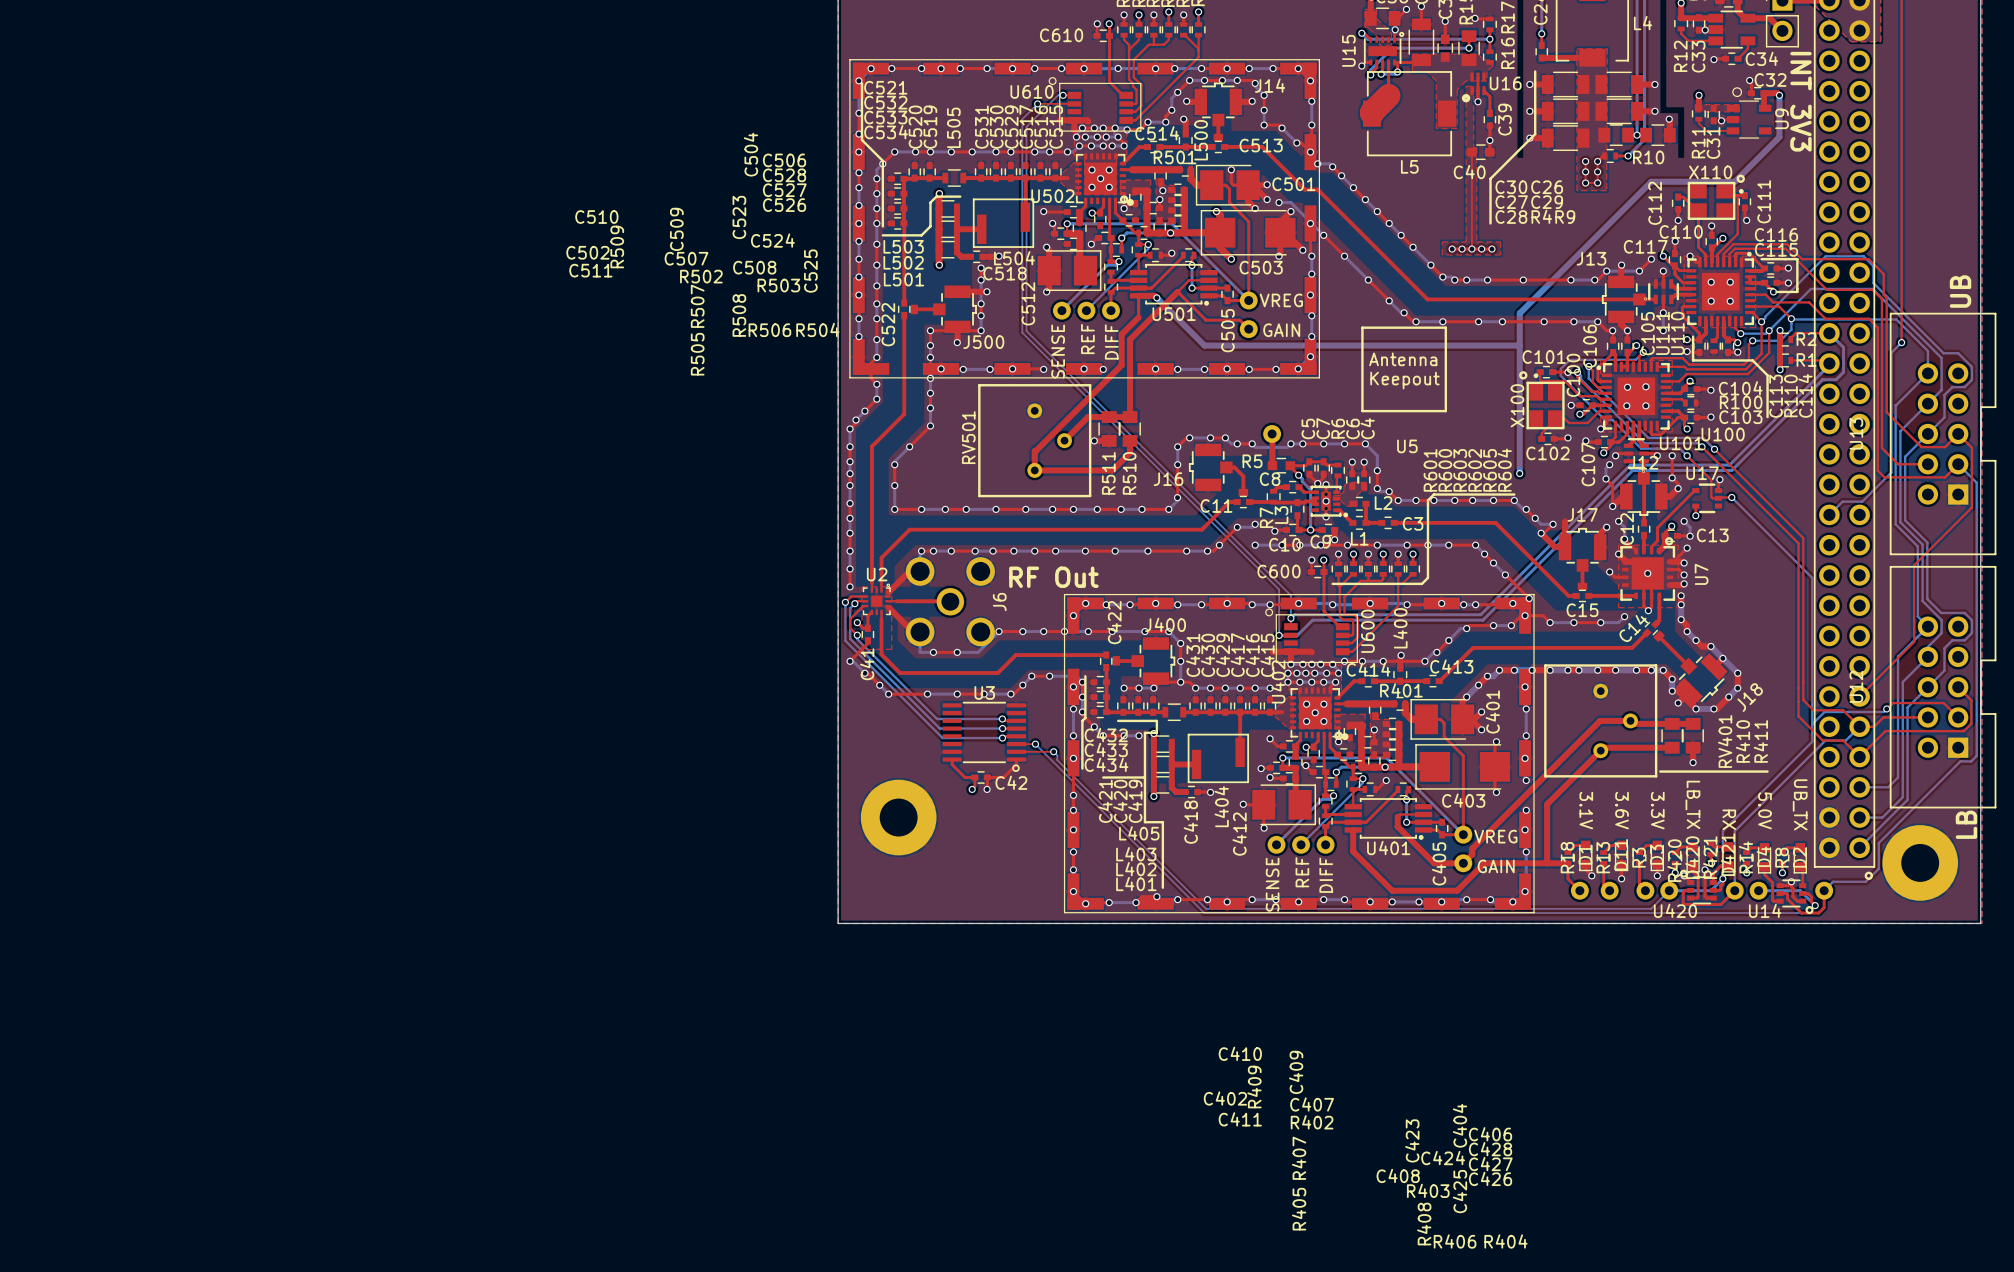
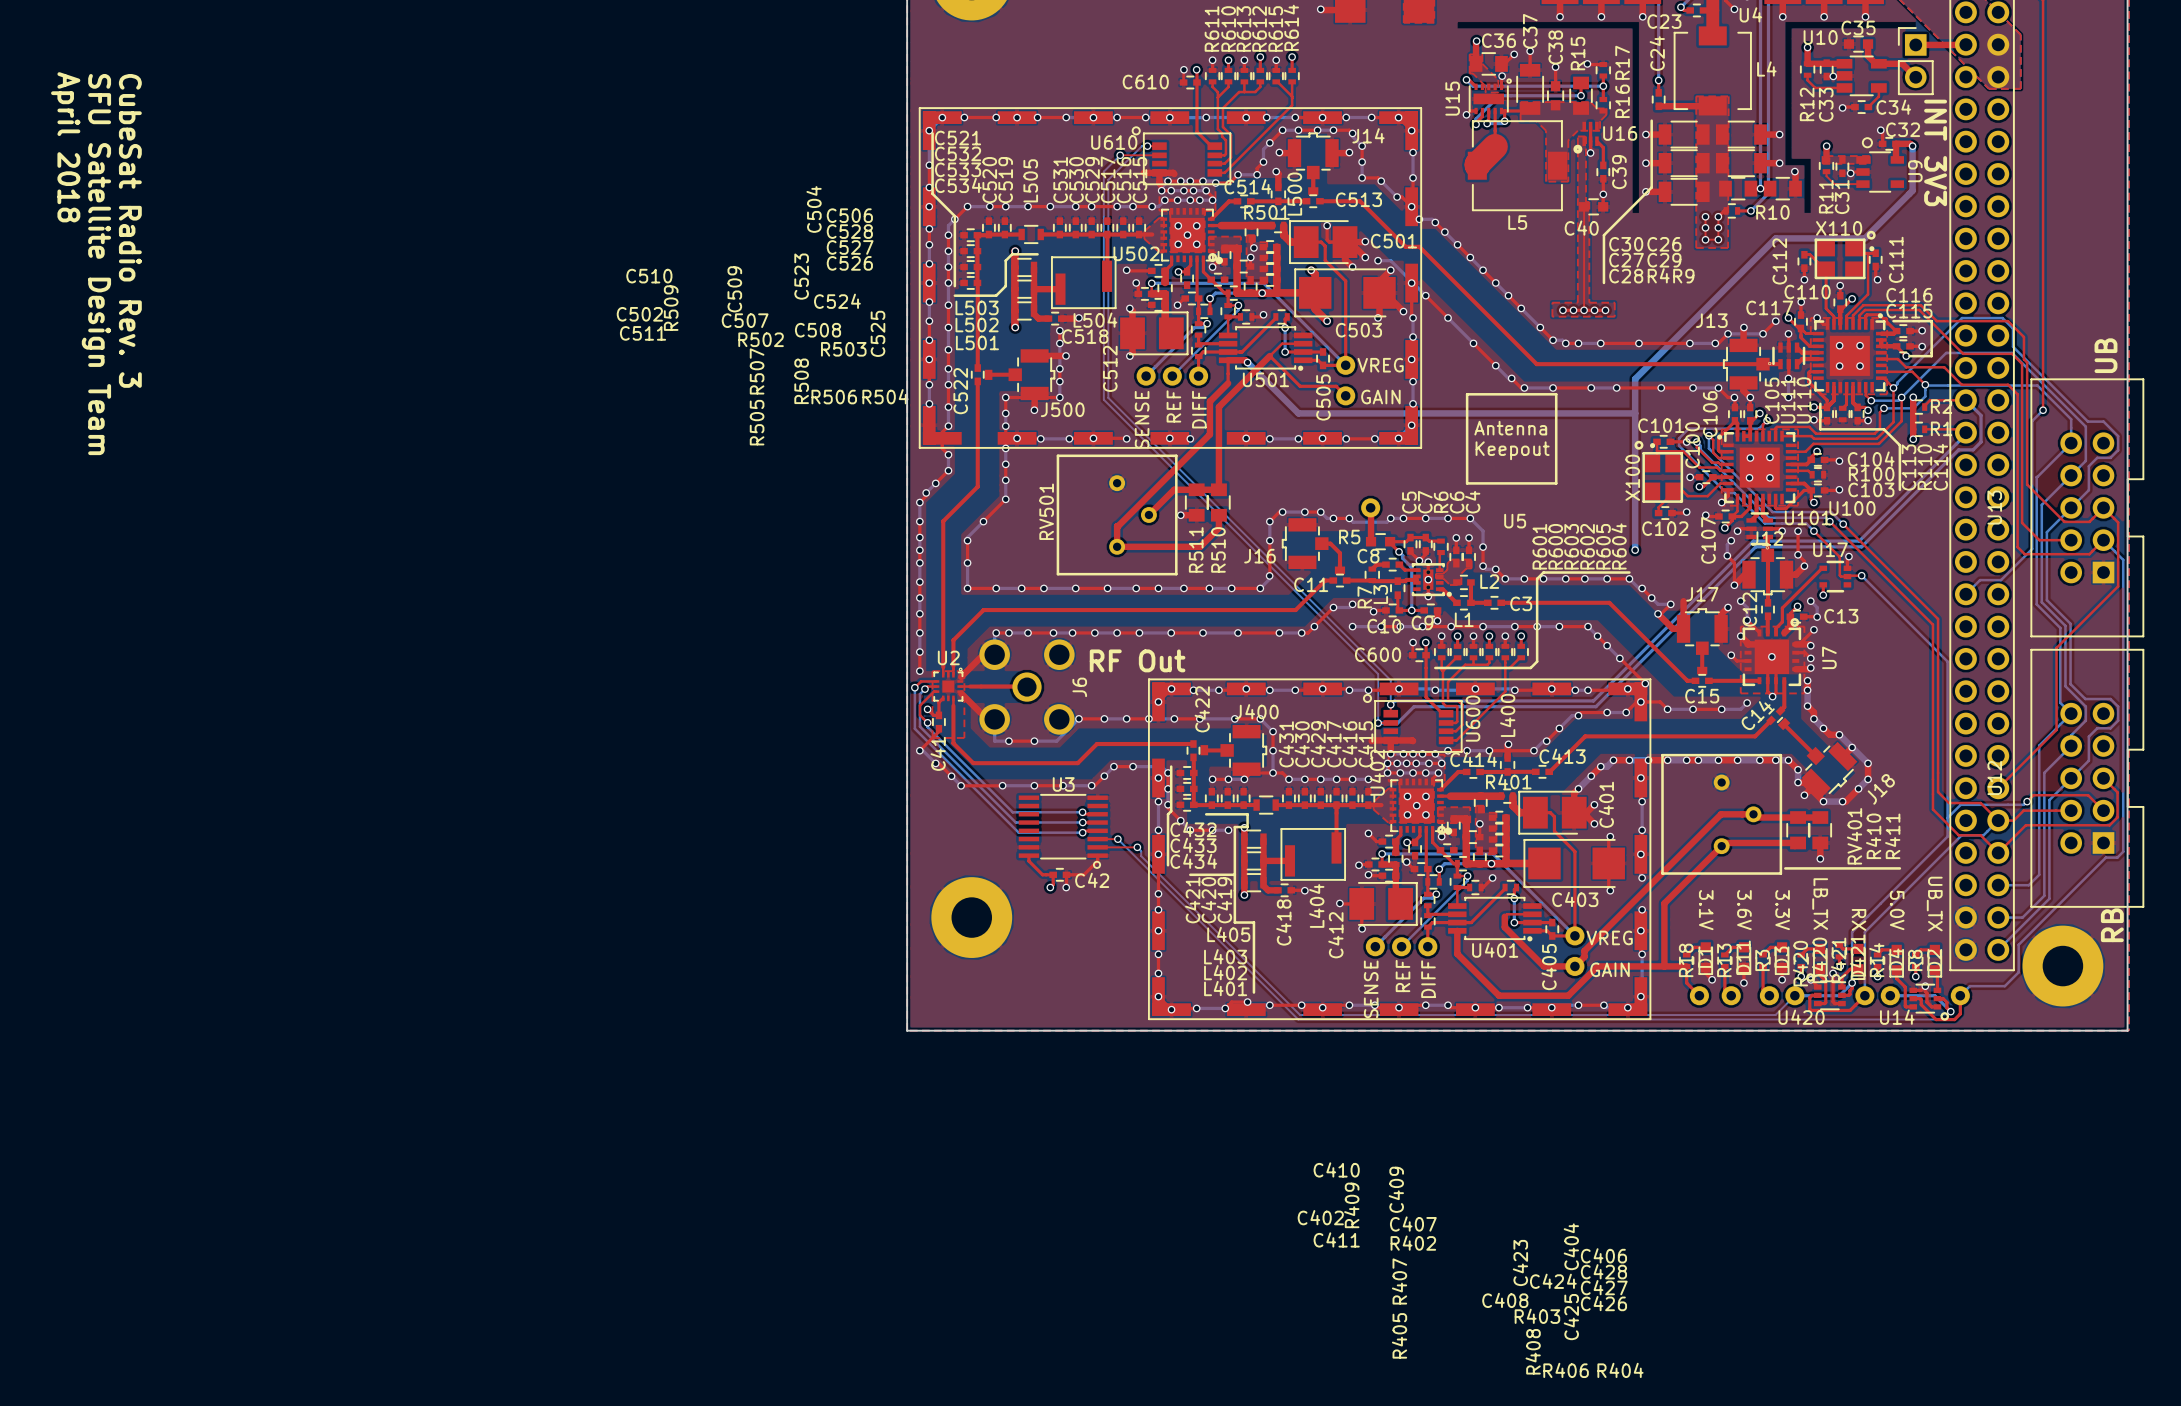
text: none -> April 2018 (65, 147)
text: none -> CubeSat Radio Rev. 3 (130, 230)
text: none -> SFU Satellite Design Team (96, 264)
text: LB (1966, 824) -> RB (2112, 925)
drawing: [1864, 871, 1874, 880] -> none

